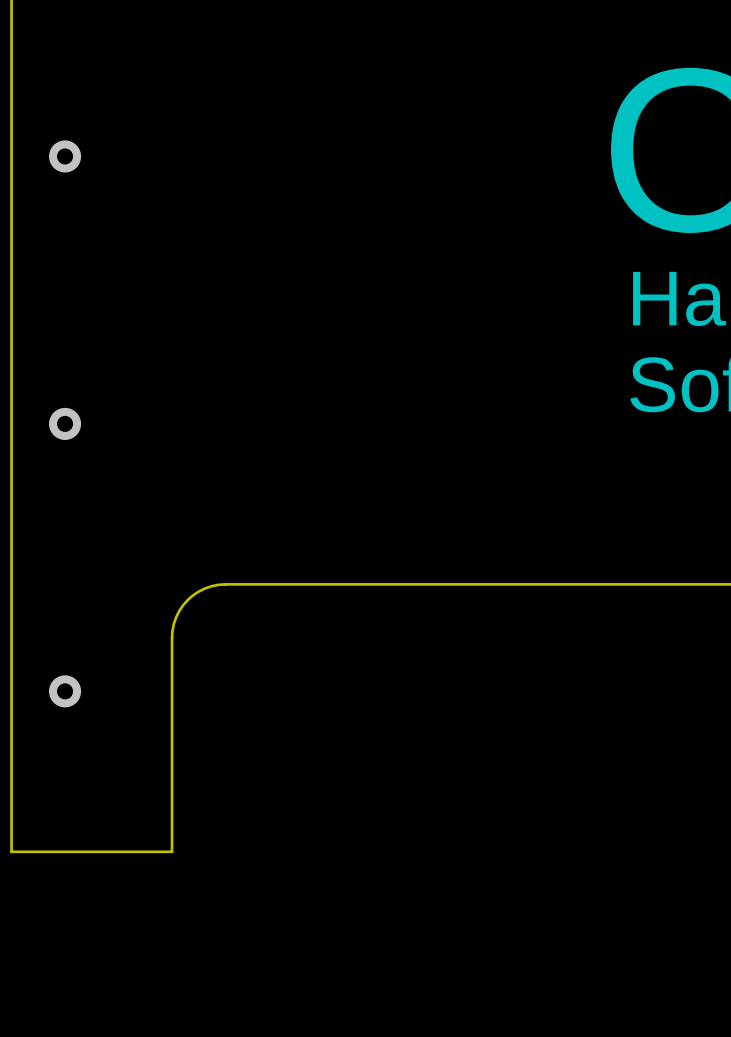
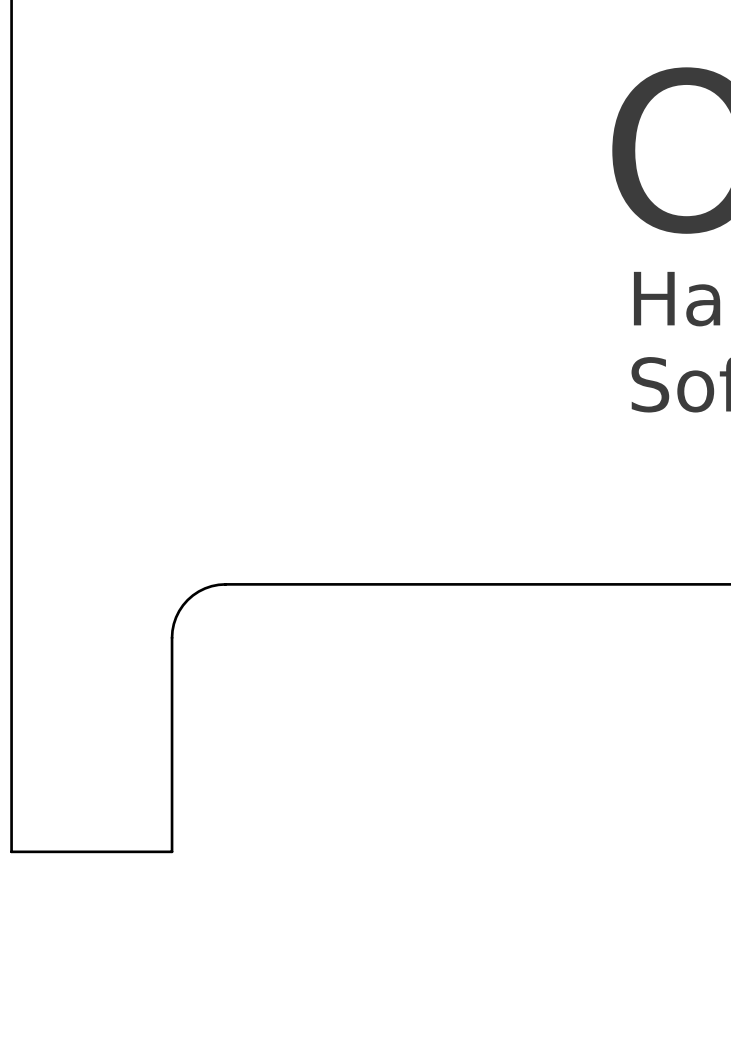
via: (65, 156) -> none
via: (65, 423) -> none
via: (65, 691) -> none

